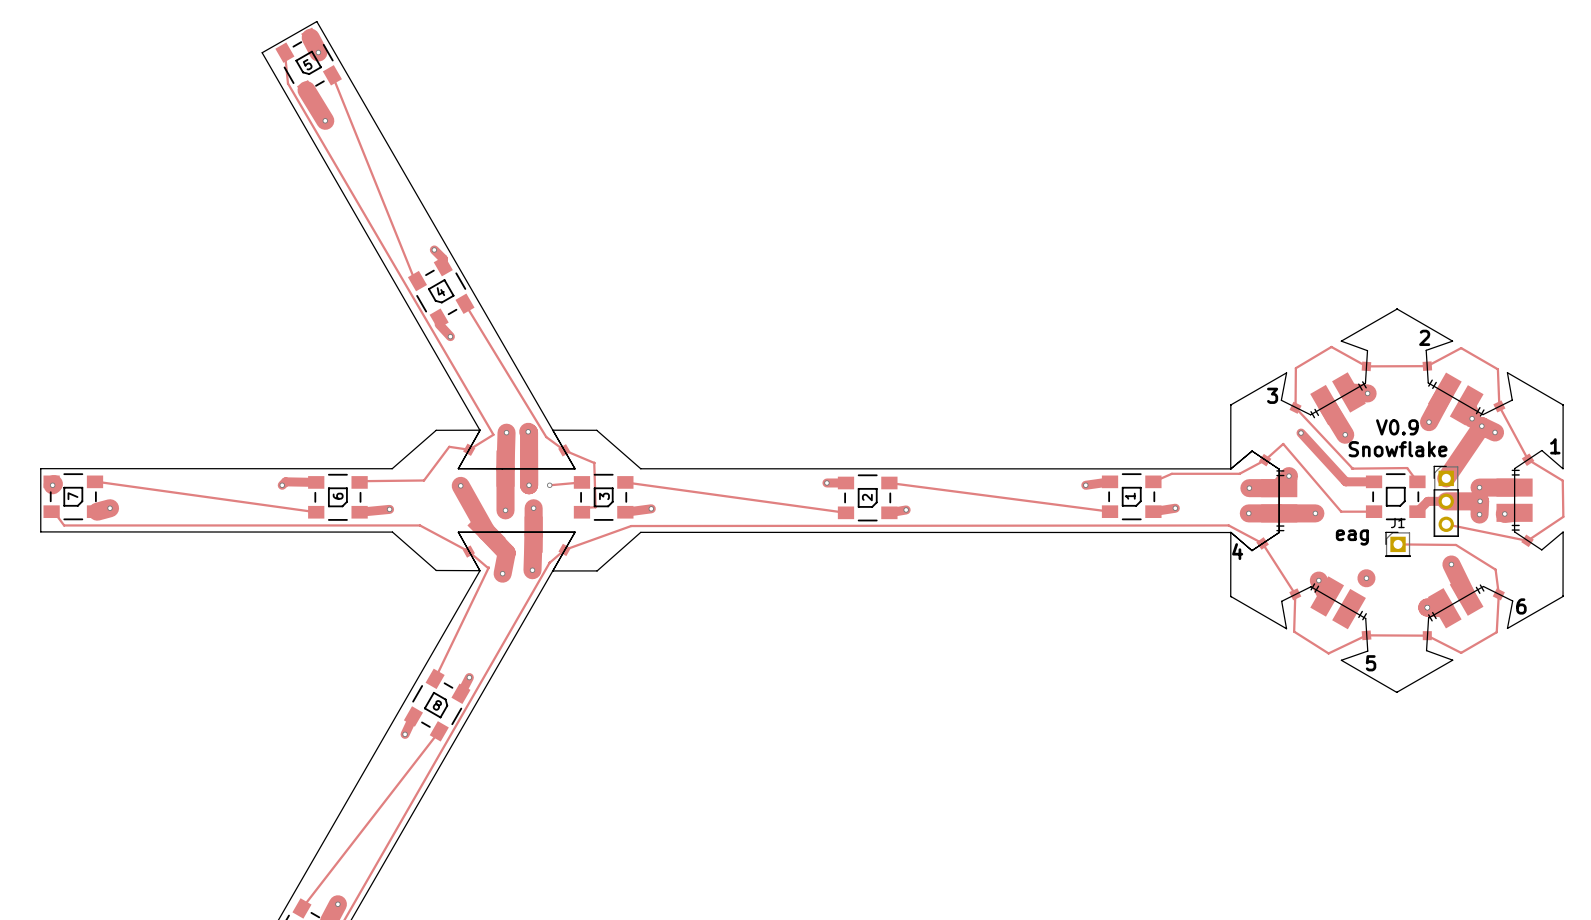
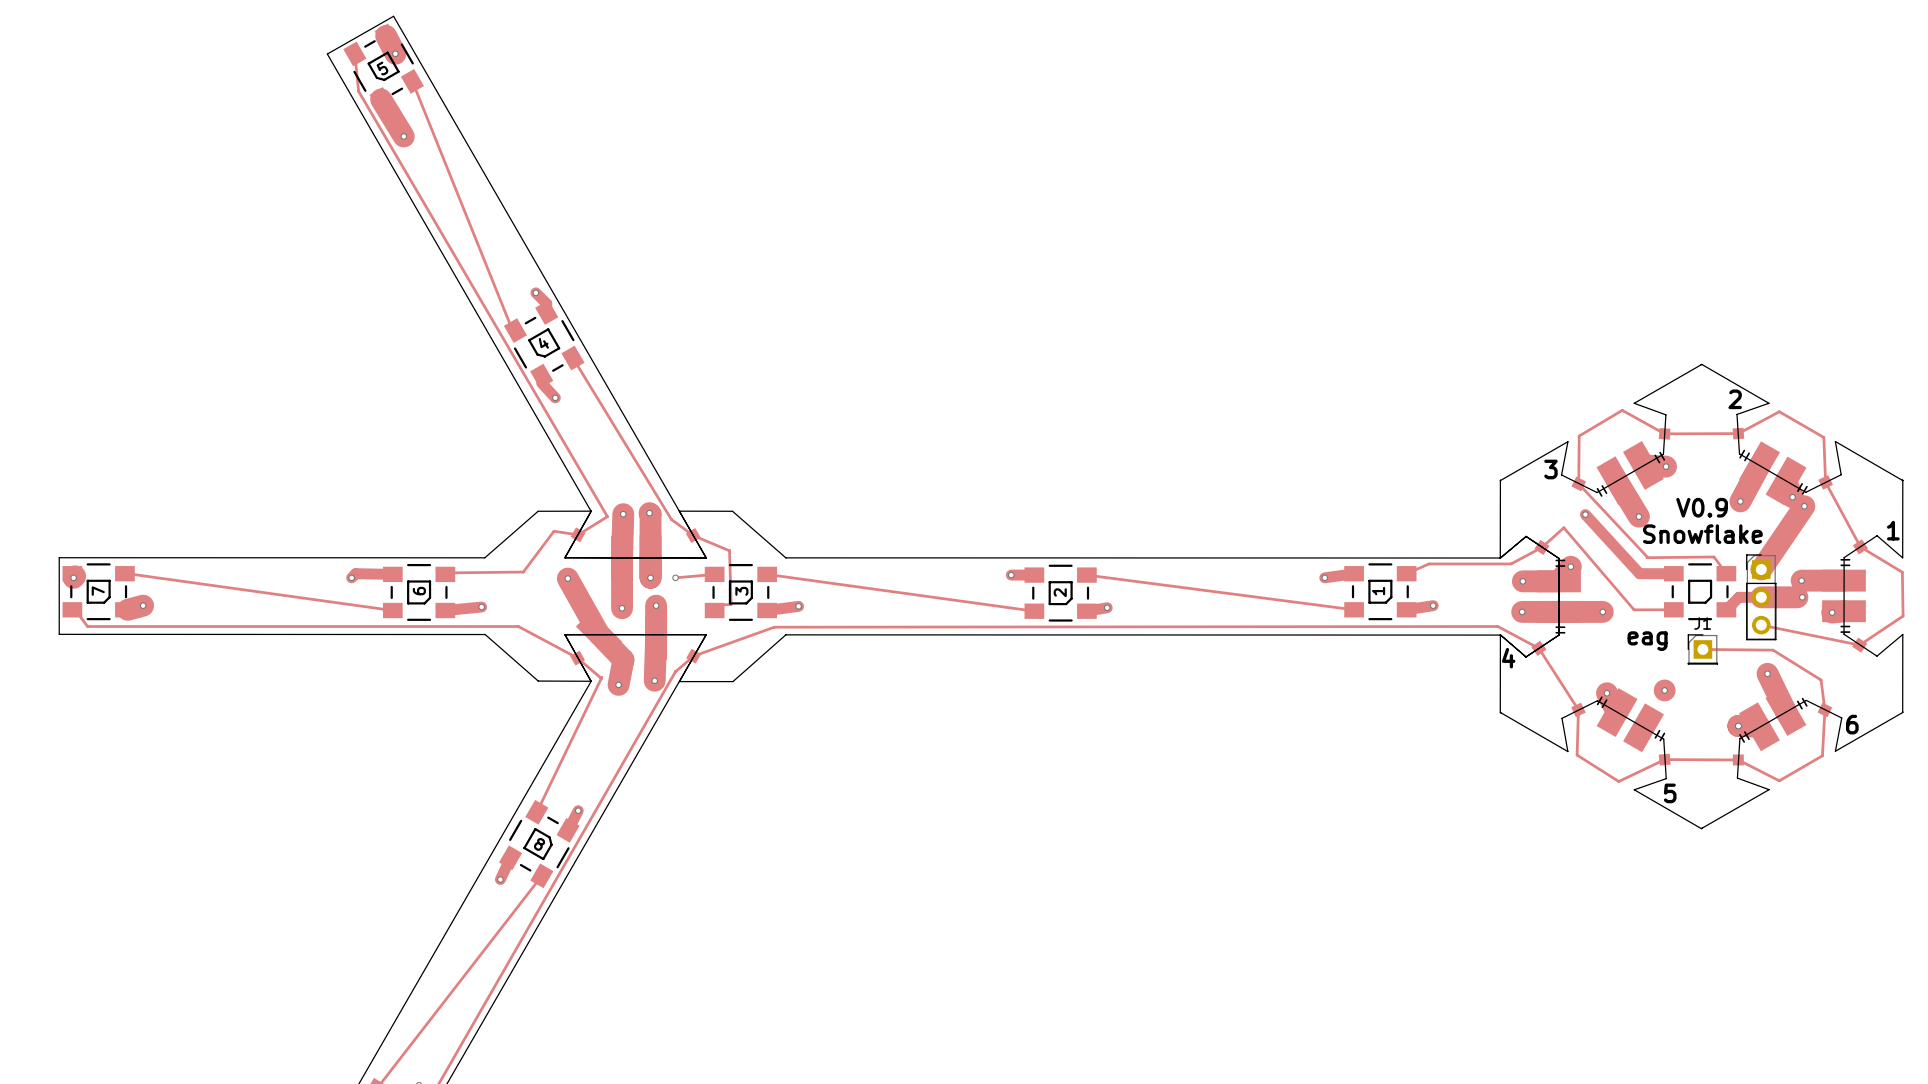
track: (1481, 426) (1495, 432) -> none
via: (1495, 432) -> none
track: (1476, 501) (1480, 501) (1479, 514) -> none
via: (1479, 514) -> none

